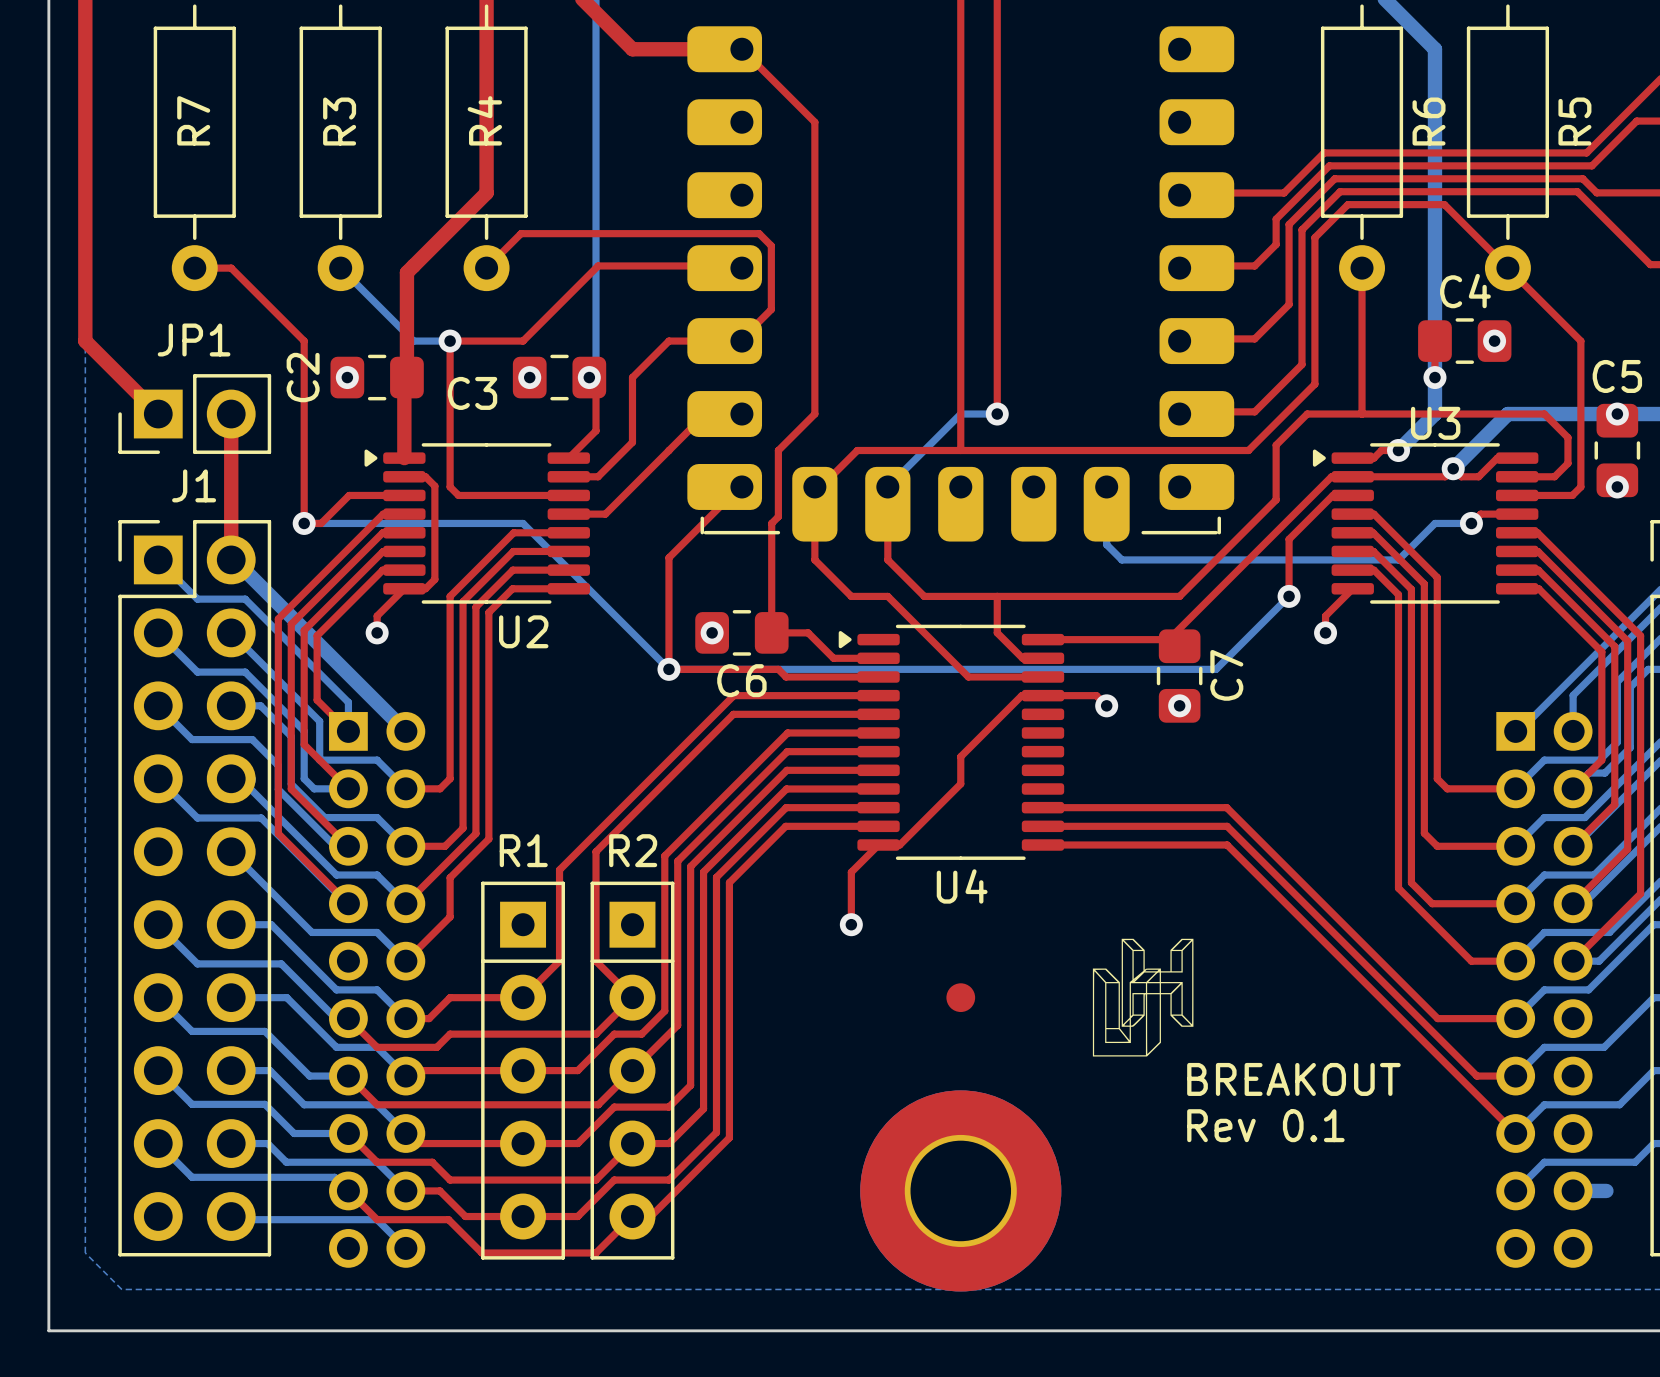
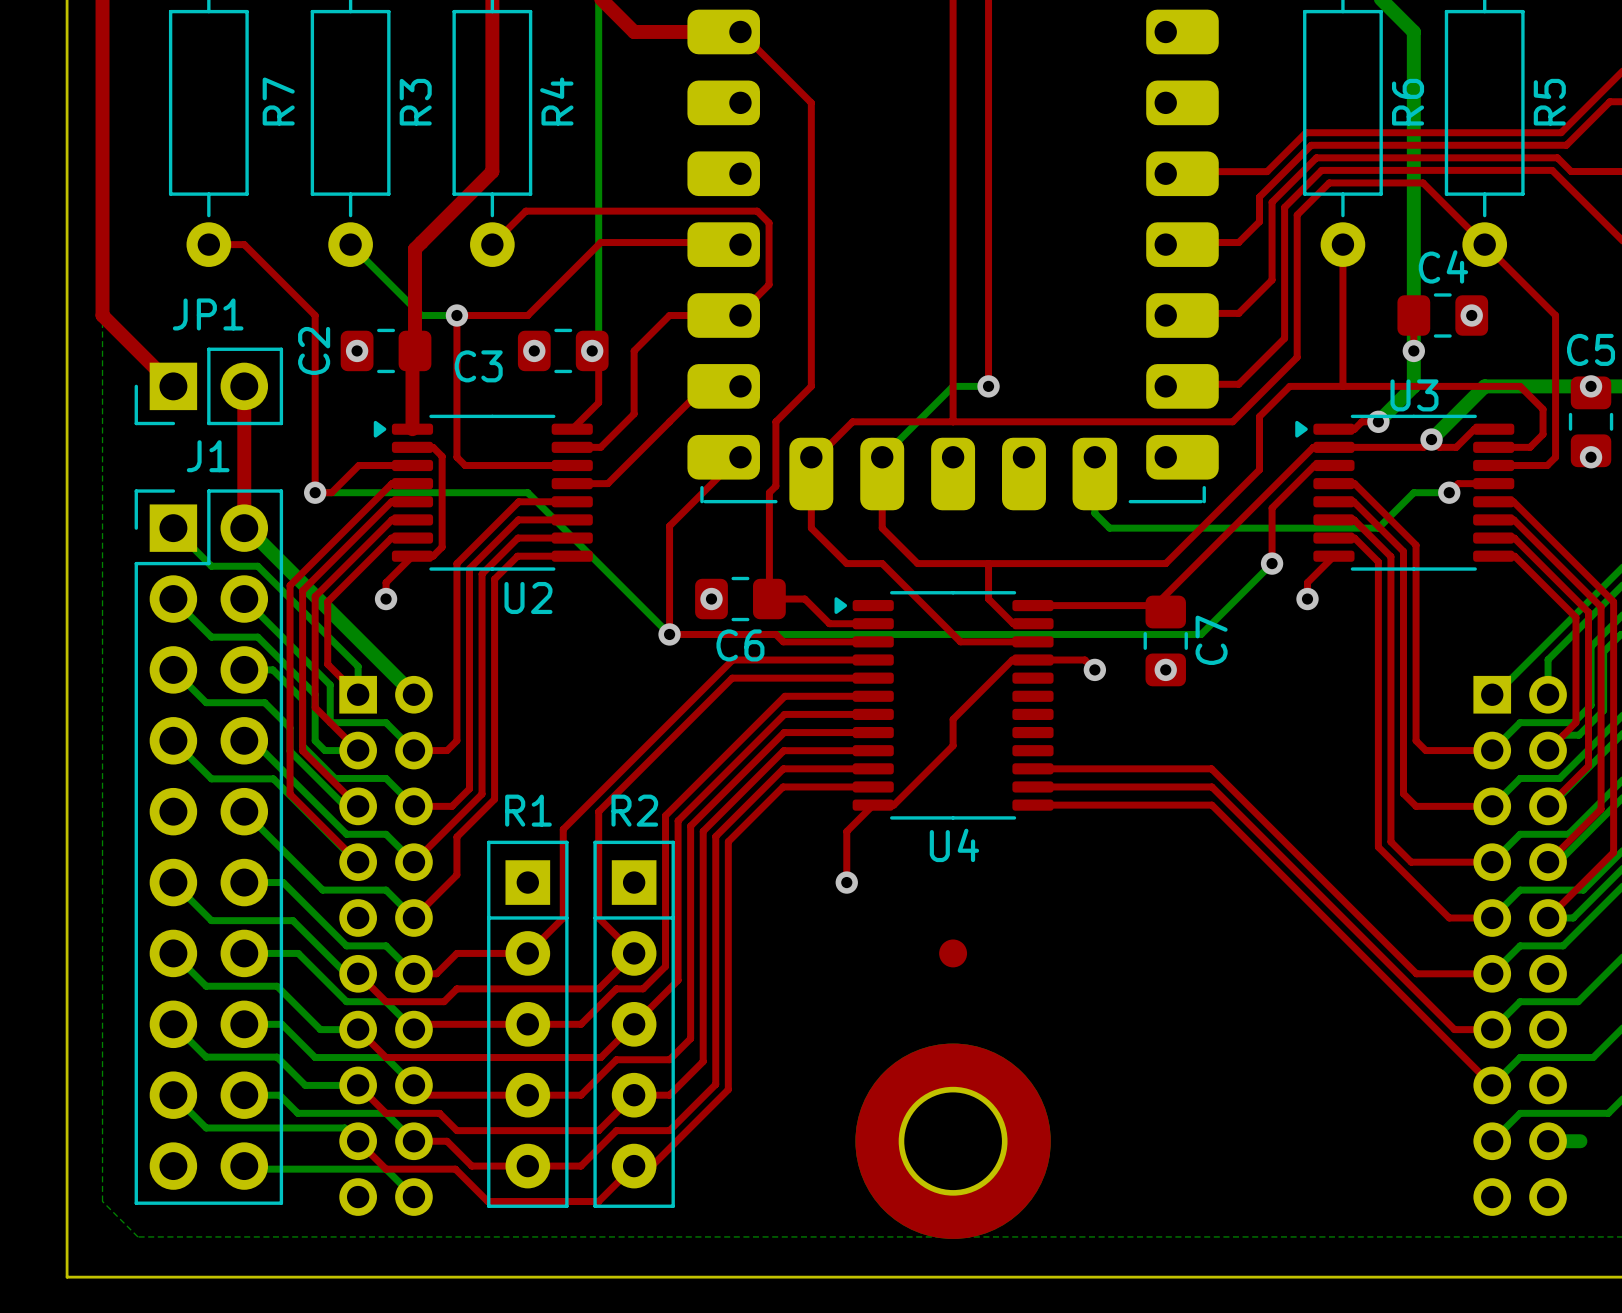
R7 name position: R7 (193, 120) -> R7 (278, 101)
R4 name position: R4 (484, 120) -> R4 (556, 101)
R3 name position: R3 (339, 121) -> R3 (415, 102)
drawing: [1092, 938, 1194, 1057] -> none
text: BREAKOUT (1293, 1079) -> none
text: Rev 0.1 (1265, 1125) -> none

